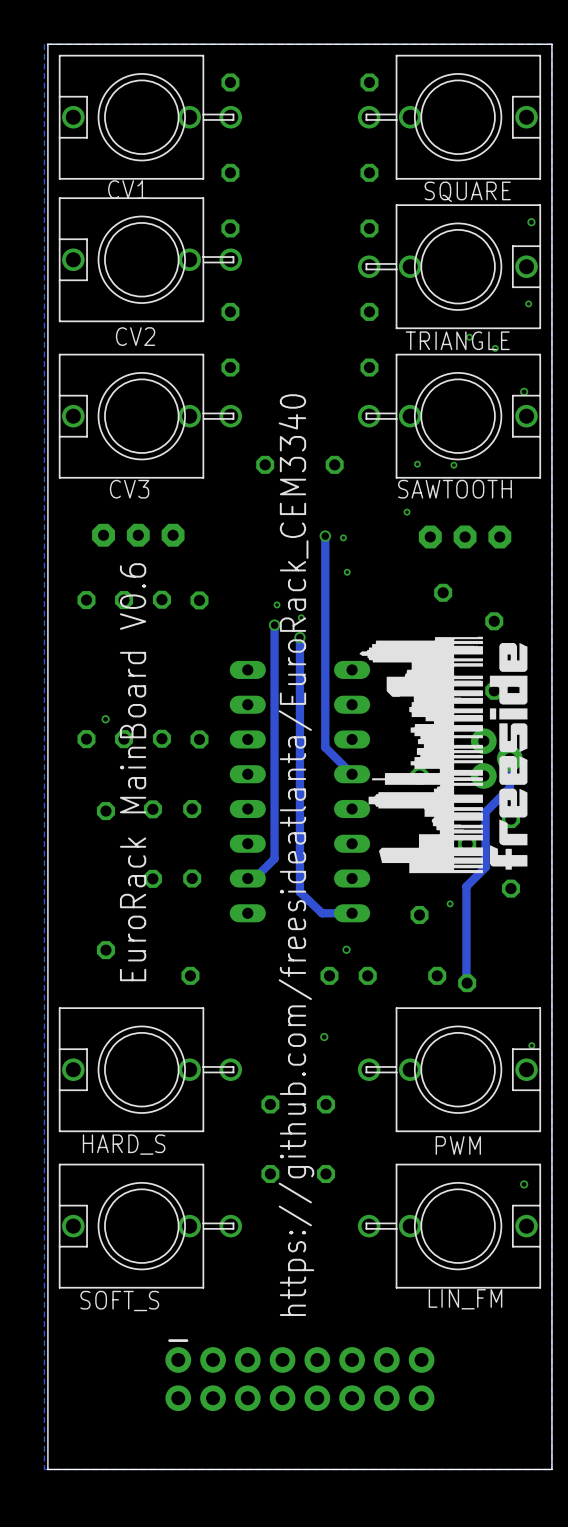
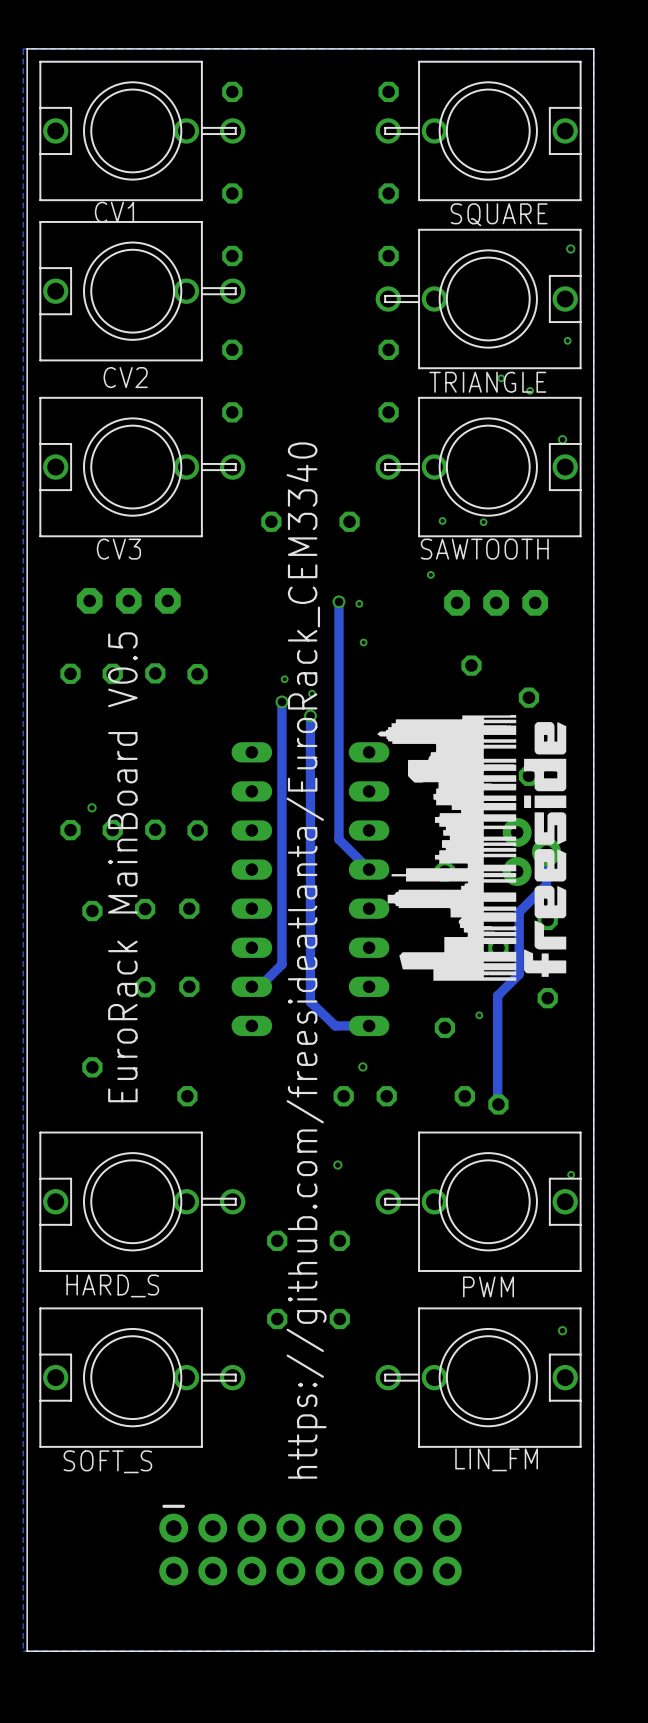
text: EuroRack MainBoard V0.6 (133, 772) -> EuroRack MainBoard V0.5 (122, 867)

